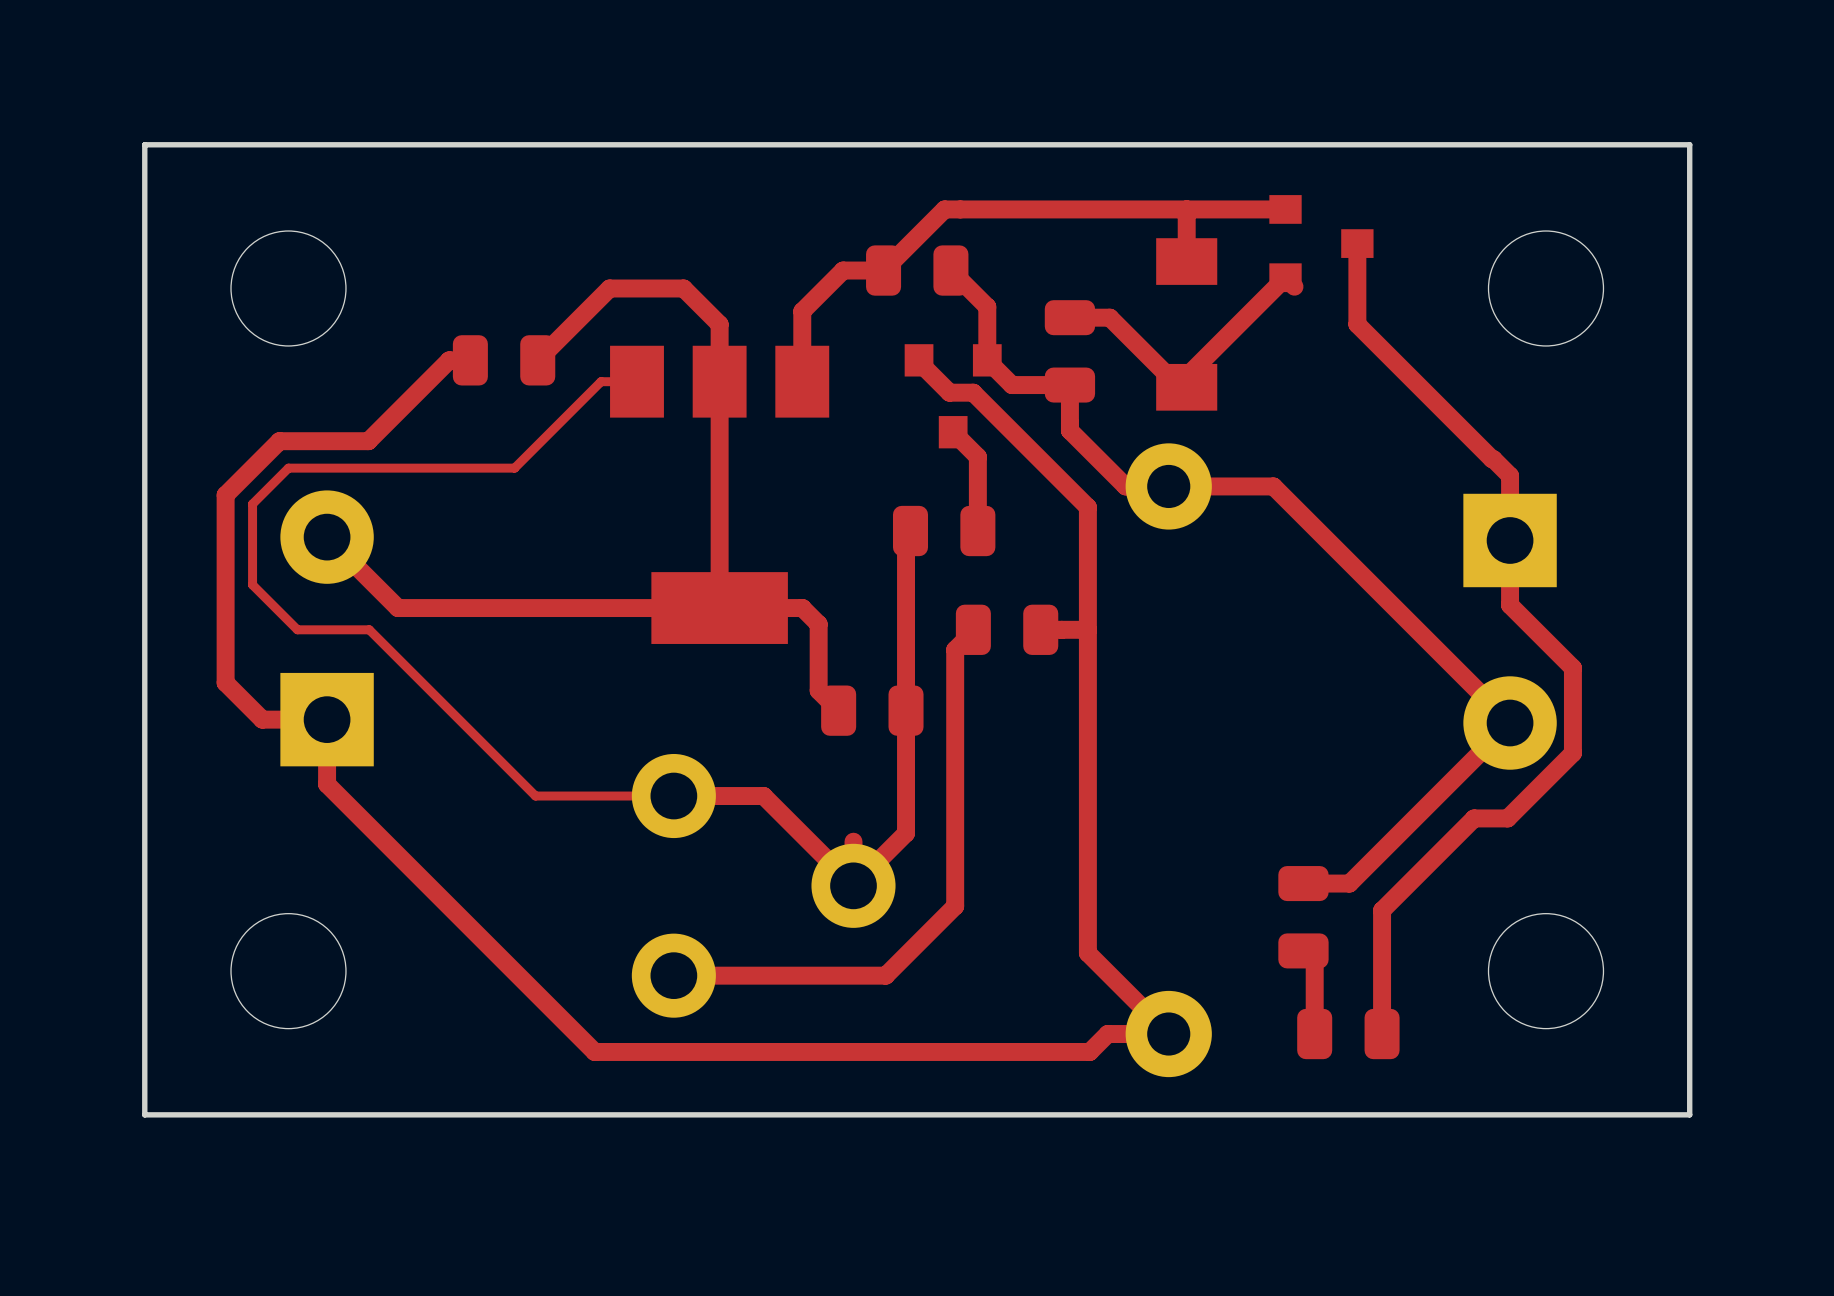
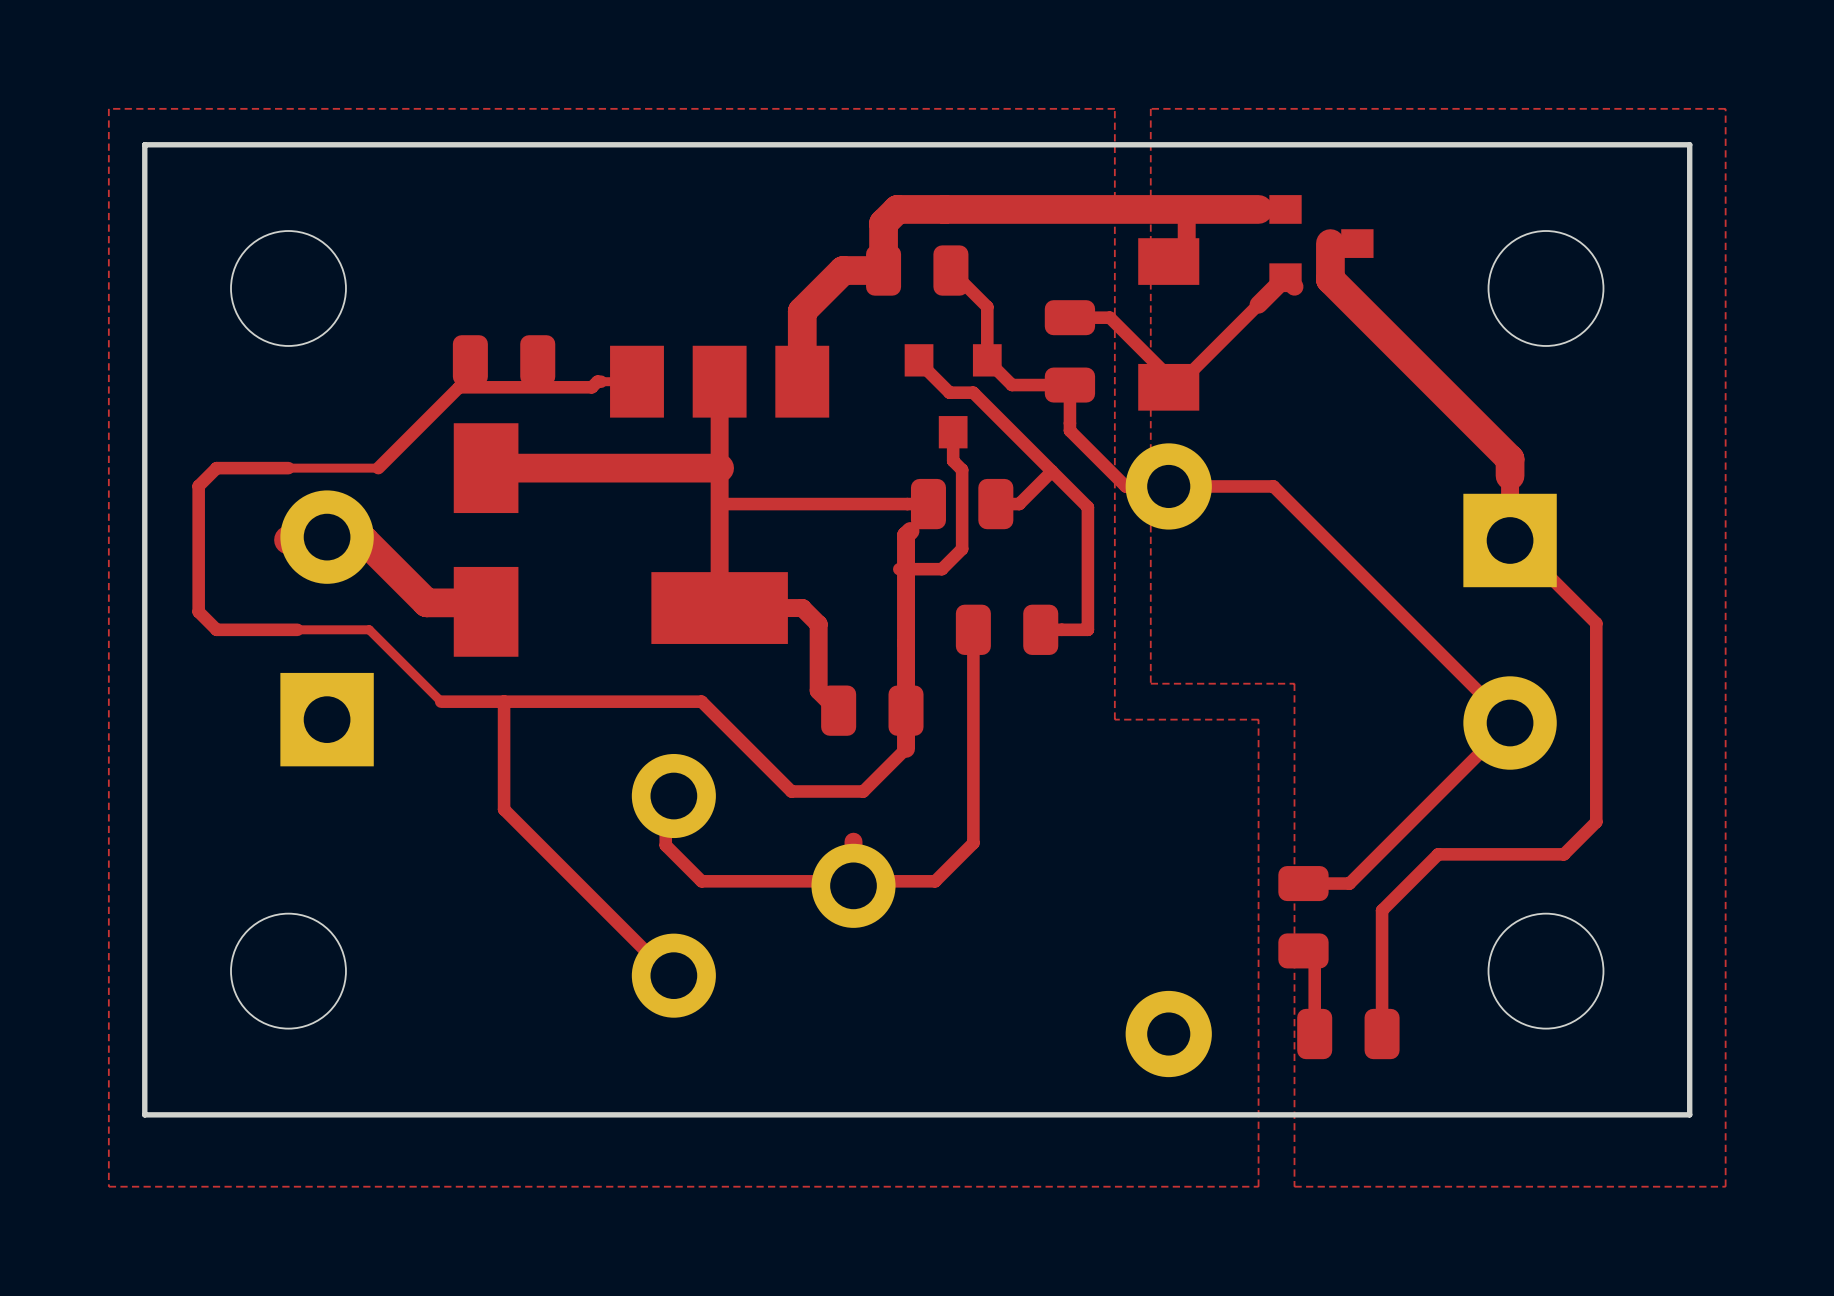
top zone outline: none -> (1114, 108) (108, 108) (108, 1186) (1258, 1186) (1258, 719) (1114, 719) (1114, 108)
top zone outline: none -> (1725, 108) (1150, 108) (1150, 683) (1294, 683) (1294, 1186) (1725, 1186) (1725, 108)
top track: (944, 209) (883, 270) -> (944, 209) (897, 209) (883, 223) (883, 270)
top track width: thin (1258, 209) (944, 209) -> thick (1258, 209) (944, 209)
top track: (1357, 243) (1357, 324) (1510, 475) -> (1330, 243) (1330, 279) (1510, 459) (1510, 475)
top track width: thin (883, 270) (843, 270) (802, 311) (802, 381) -> thick (883, 270) (843, 270) (802, 311) (802, 381)
top track width: thick (950, 270) (987, 306) (987, 360) (1012, 385) (1069, 385) (1069, 430) (1125, 486) (1273, 486) (1510, 723) (1349, 883) (1303, 883) -> thin (950, 270) (987, 306) (987, 360) (1012, 385) (1069, 385) (1069, 430) (1125, 486) (1273, 486) (1510, 723) (1349, 883) (1303, 883)
top track width: thick (1258, 304) (1186, 376) (1186, 387) (1179, 387) (1109, 317) (1069, 317) -> thin (1258, 304) (1186, 376) (1186, 387) (1179, 387) (1109, 317) (1069, 317)
part position: (1186, 324) -> (1168, 324)
top track: (470, 360) (449, 360) (368, 441) (279, 441) (225, 495) (225, 682) (262, 719) (327, 719) (327, 784) (594, 1051) (1089, 1051) (1107, 1034) (1168, 1034) (1087, 953) (1087, 629) -> none
top track: (537, 360) (609, 288) (683, 288) (719, 324) (719, 381) -> none
top track width: thick (919, 360) (949, 392) (973, 392) (1087, 507) (1087, 629) (1040, 629) -> thin (919, 360) (949, 392) (973, 392) (1087, 507) (1087, 629) (1040, 629)
top track: (601, 381) (514, 468) -> (601, 381) (597, 381) (591, 387) (459, 387) (378, 468)
top track: (953, 432) (977, 456) (977, 531) -> (953, 432) (953, 460) (962, 469) (962, 548) (941, 569) (899, 569)
top track: (288, 468) (252, 504) (252, 584) (297, 629) -> (288, 468) (216, 468) (198, 486) (198, 611) (216, 629) (297, 629)
top track: (486, 468) (378, 468) -> none
top track: none -> (719, 468) (514, 468)
top track: none -> (1051, 471) (1019, 504) (995, 504)
top track: none -> (928, 504) (719, 504)
part position: (944, 531) -> (962, 504)
top track: (327, 537) (398, 608) (719, 608) -> none
top track: none -> (288, 539) (363, 539) (426, 602) (477, 602) (486, 611)
part: none -> (486, 539)
top track: (1510, 540) (1510, 605) (1572, 668) (1572, 753) (1507, 818) (1474, 818) (1438, 854) -> (1510, 537) (1596, 623) (1596, 822) (1563, 854) (1438, 854)
top track: none -> (973, 629) (973, 843) (935, 881) (701, 881) (665, 845) (665, 791)
top track: (973, 631) (955, 649) (955, 906) (885, 975) (673, 975) -> none
top track: (441, 701) (535, 796) (763, 796) (853, 885) (906, 833) (906, 748) -> (441, 701) (701, 701) (791, 791) (863, 791) (906, 748)
top track: none -> (504, 701) (504, 809) (665, 971)
top track width: thick (1438, 854) (1382, 910) (1382, 1034) -> thin (1438, 854) (1382, 910) (1382, 1034)
top track width: thick (1303, 950) (1314, 962) (1314, 1034) -> thin (1303, 950) (1314, 962) (1314, 1034)

